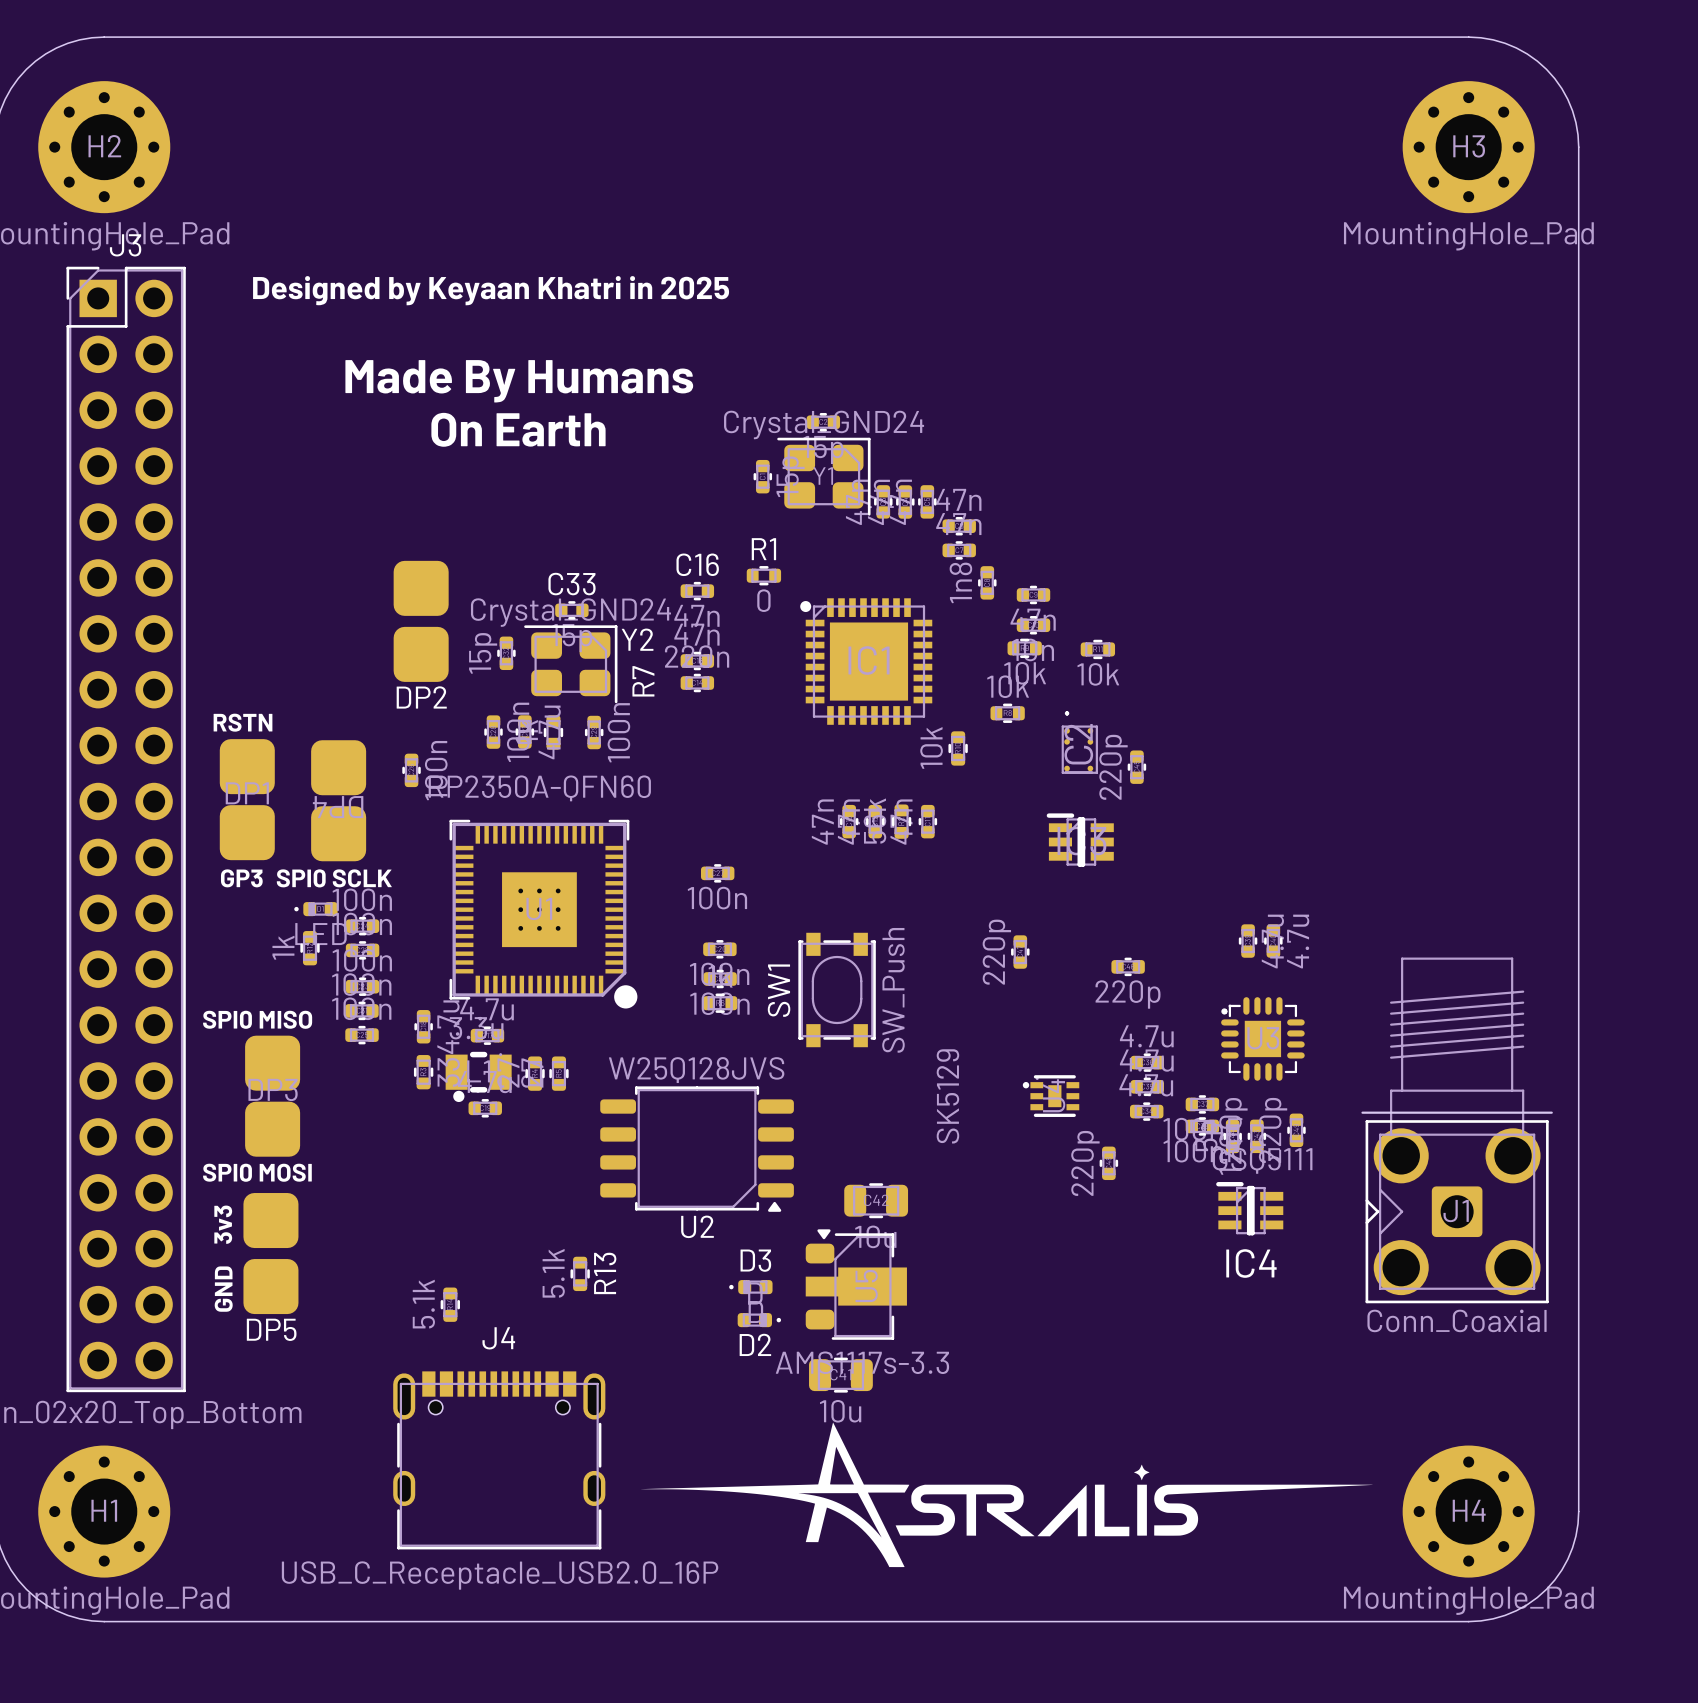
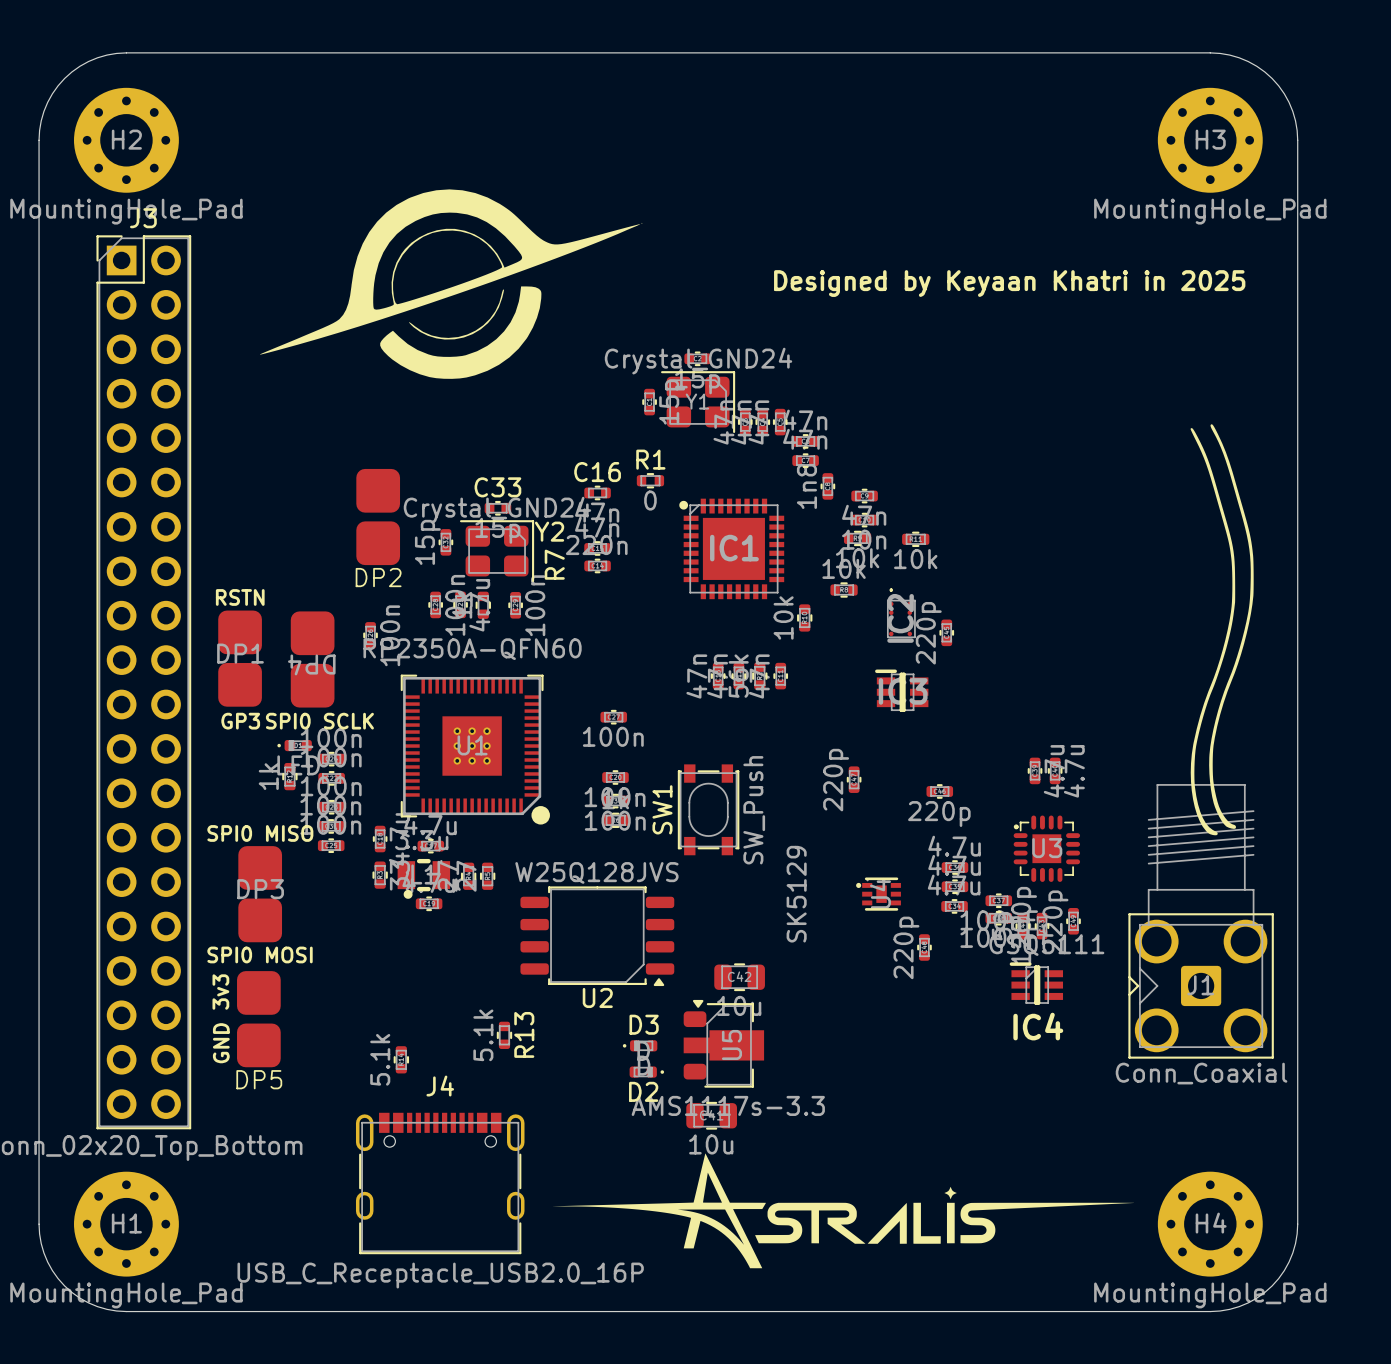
drawing: none -> [260, 189, 643, 379]
text: Designed by Keyaan Khatri in 2025 (491, 290) -> none
text: none -> Designed by Keyaan Khatri in 2025 (1009, 283)
text: Made By Humans (519, 381) -> none
text: On Earth (518, 429) -> none
drawing: none -> [1190, 424, 1254, 836]
J1 footprint: [1361, 957, 1553, 1304] -> [1128, 784, 1274, 1059]

